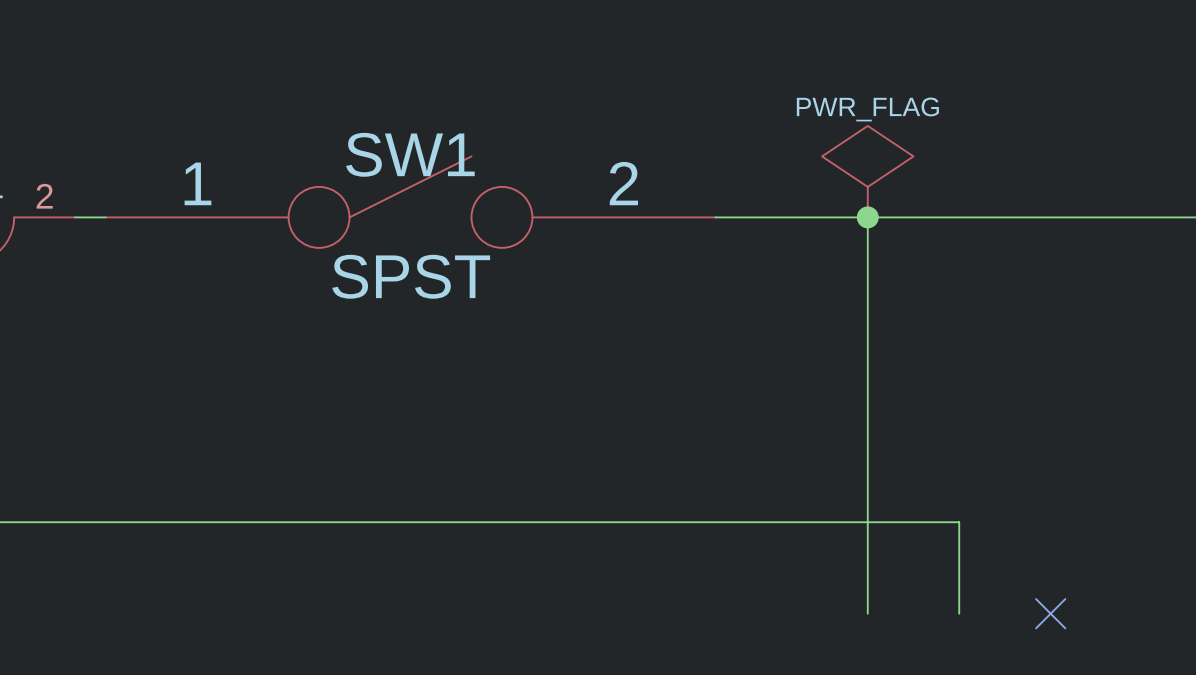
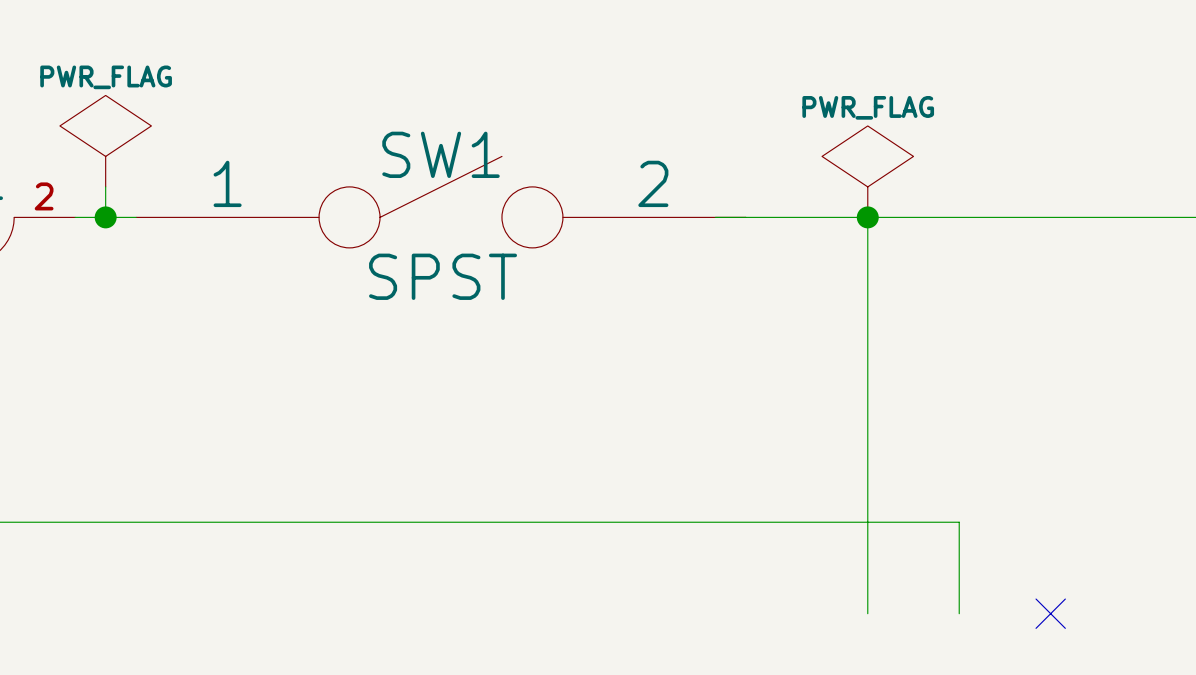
power symbol: none -> PWR_FLAG (105, 141)
wire: none -> (105, 186) (105, 217) (136, 217)
SW1 position: (410, 202) -> (441, 202)
junction: none -> (105, 217)

